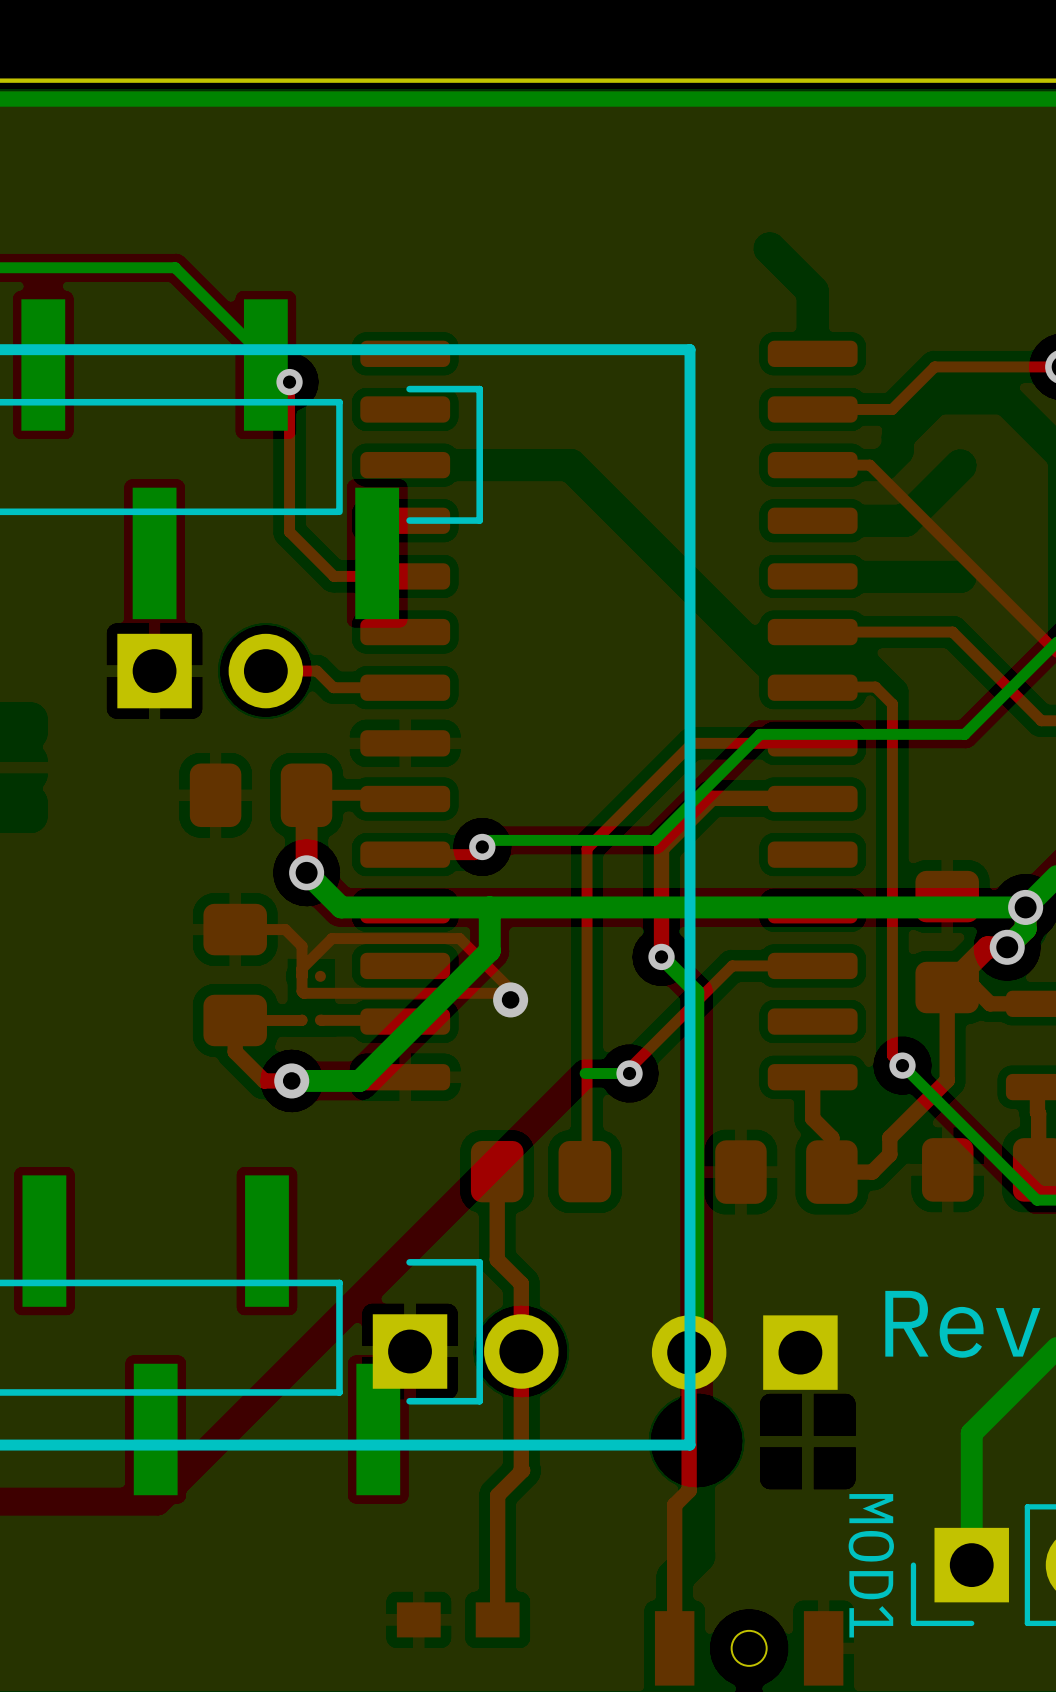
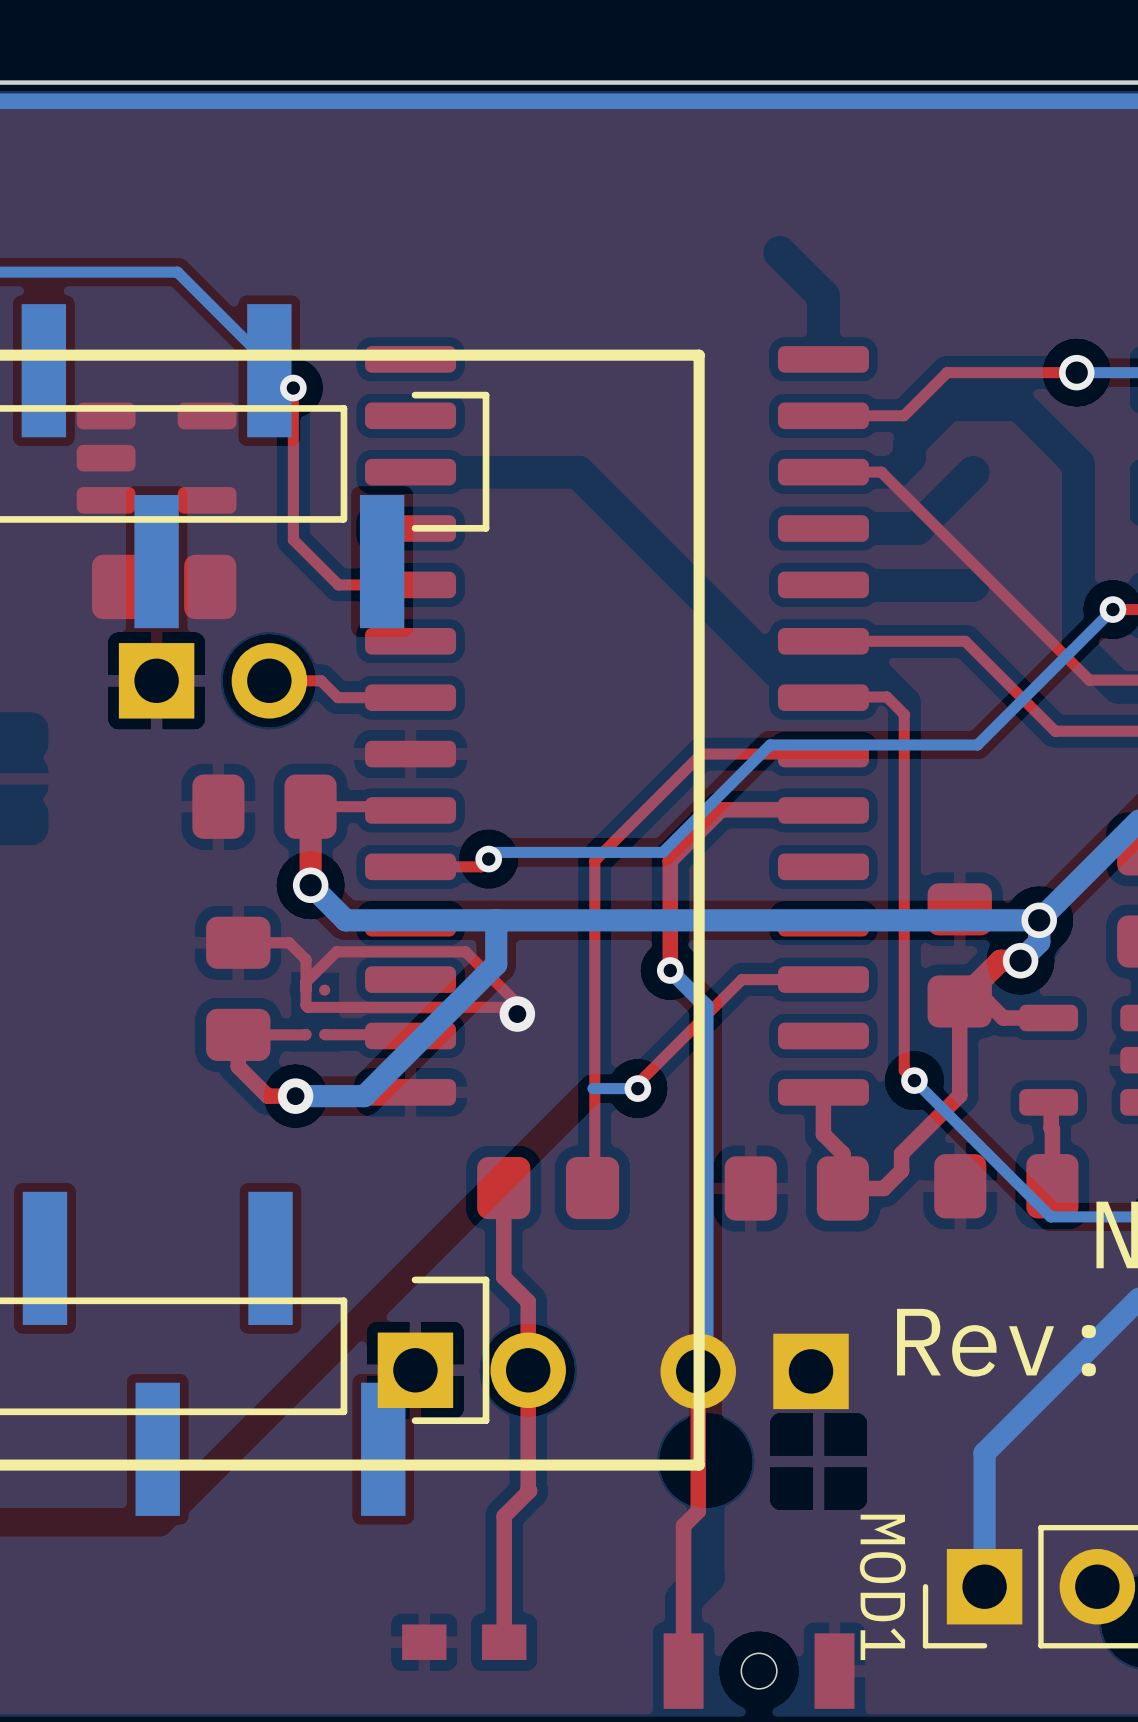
part: none -> (156, 458)
part: none -> (164, 586)

